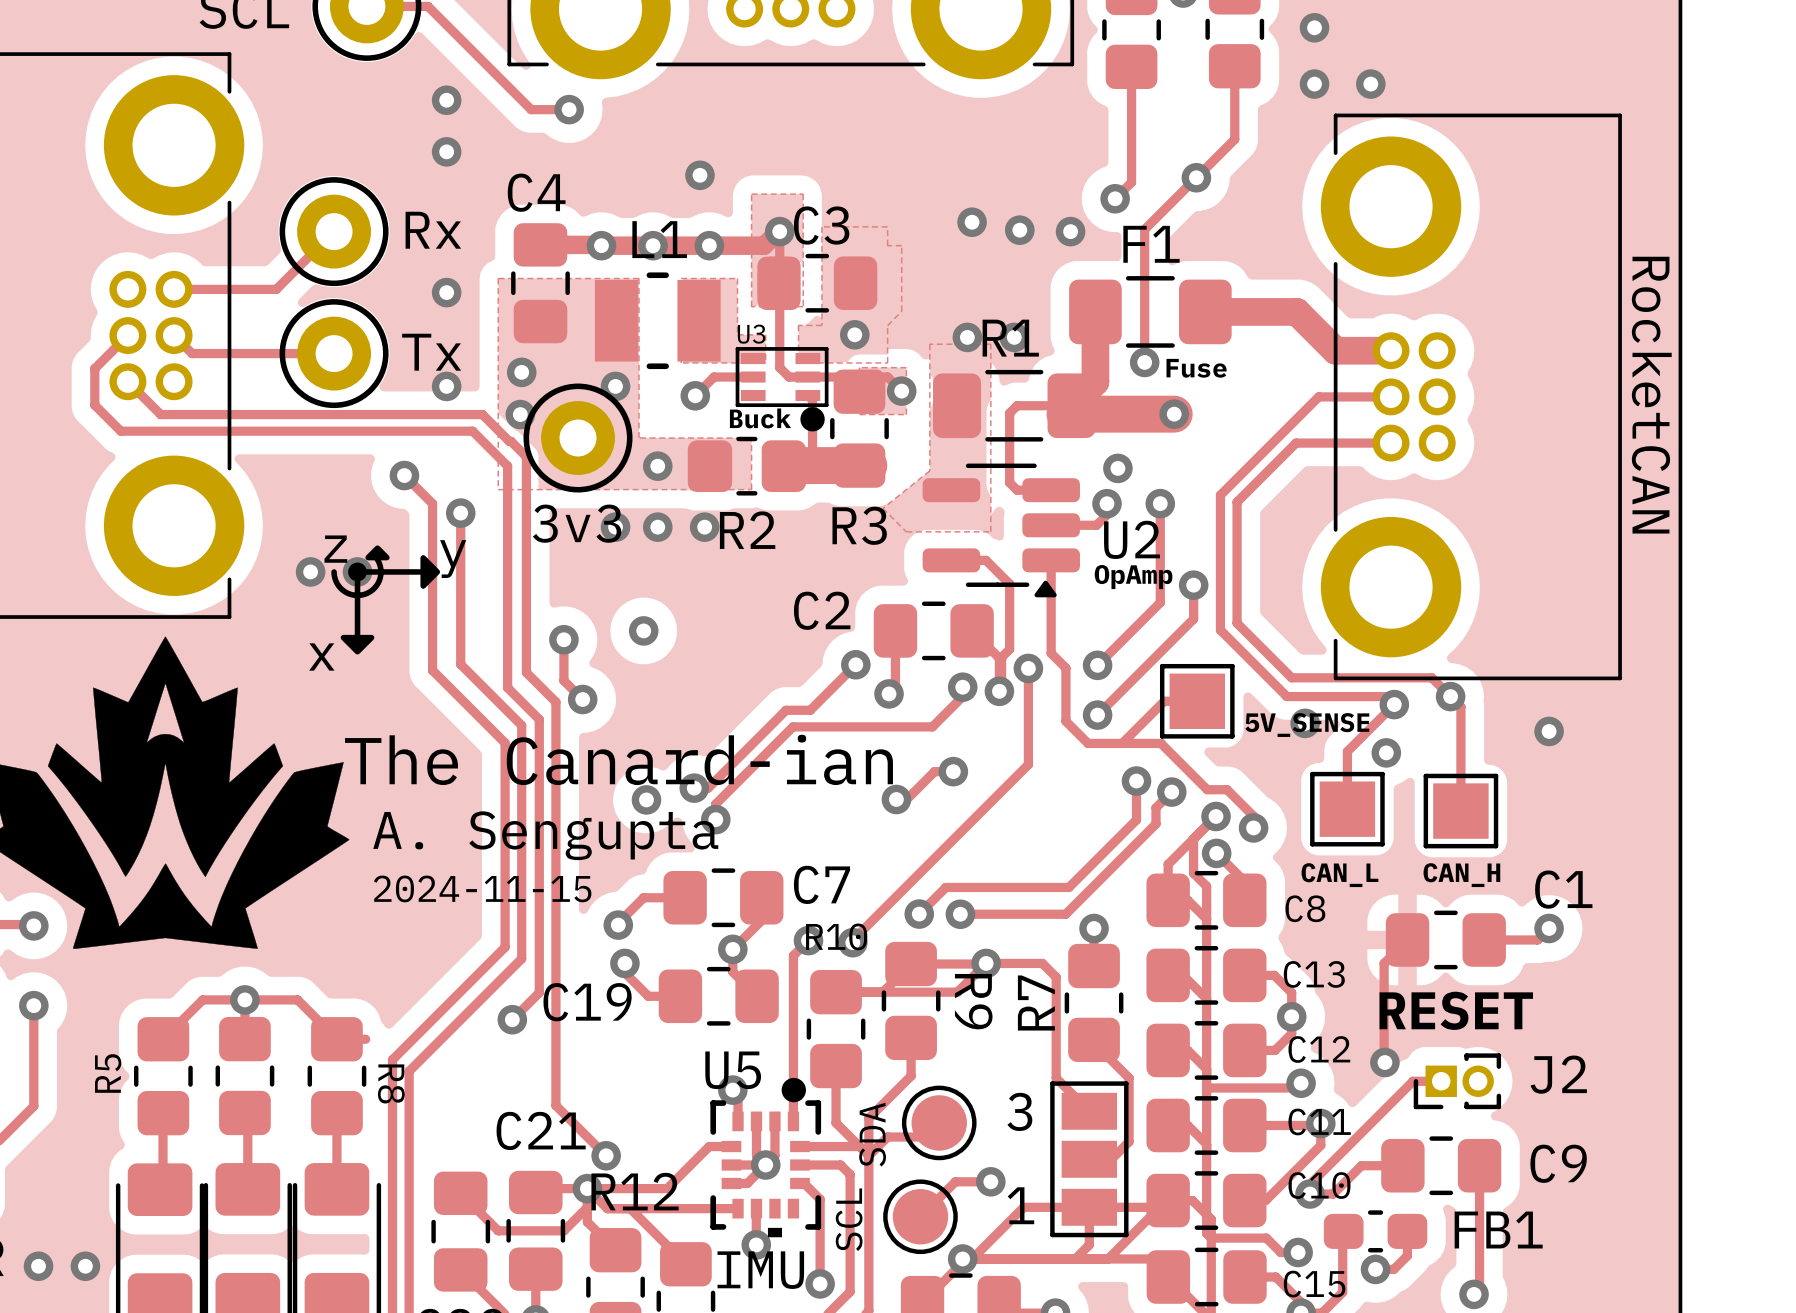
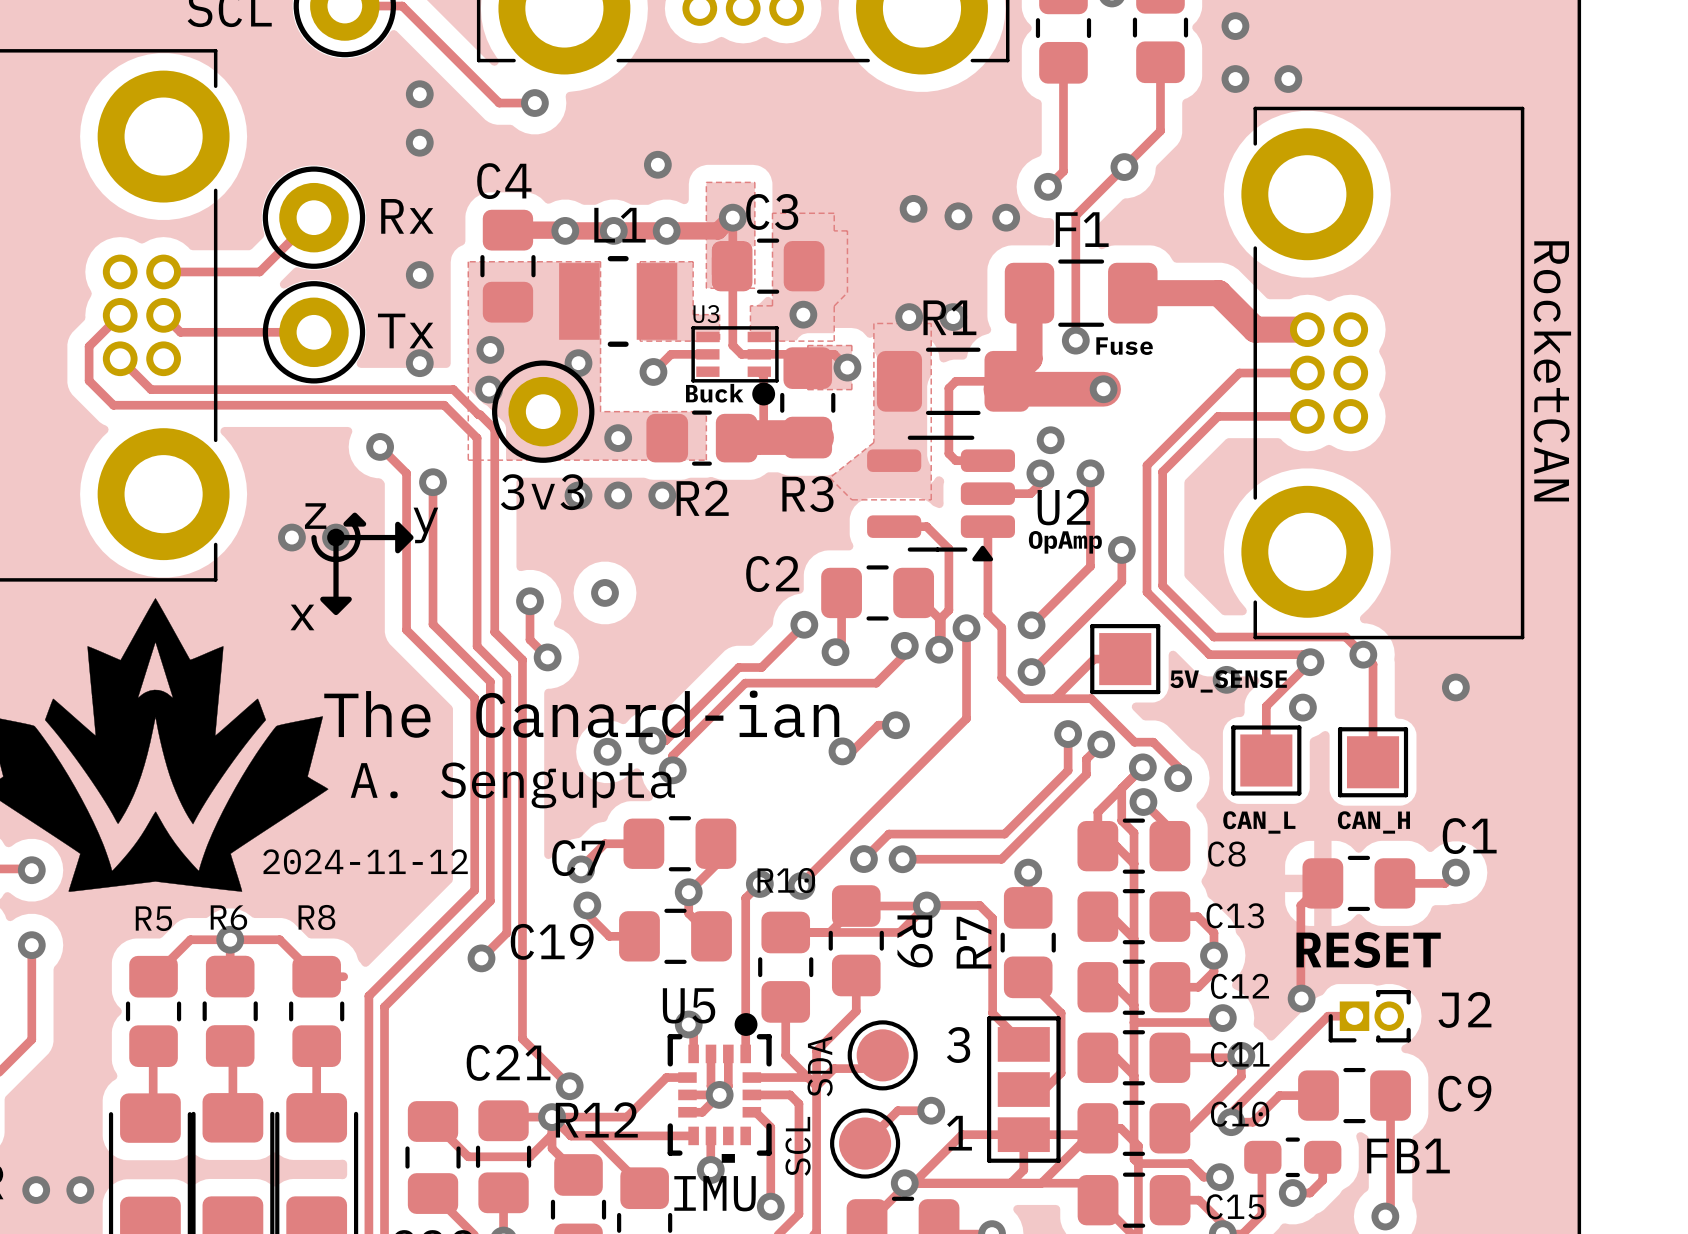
C7 name position: C7 (821, 884) -> C7 (578, 858)
text: 2024-11-15 (482, 888) -> 2024-11-12 (365, 861)
R6 name: none -> R6 (228, 917)
R5 name rotation: 0° (108, 1073) -> 90° clockwise (153, 918)
R5 name position: R5 (108, 1073) -> R5 (153, 918)
R8 name rotation: 0° (391, 1083) -> 90° counterclockwise (316, 917)
R8 name position: R8 (391, 1083) -> R8 (316, 917)

